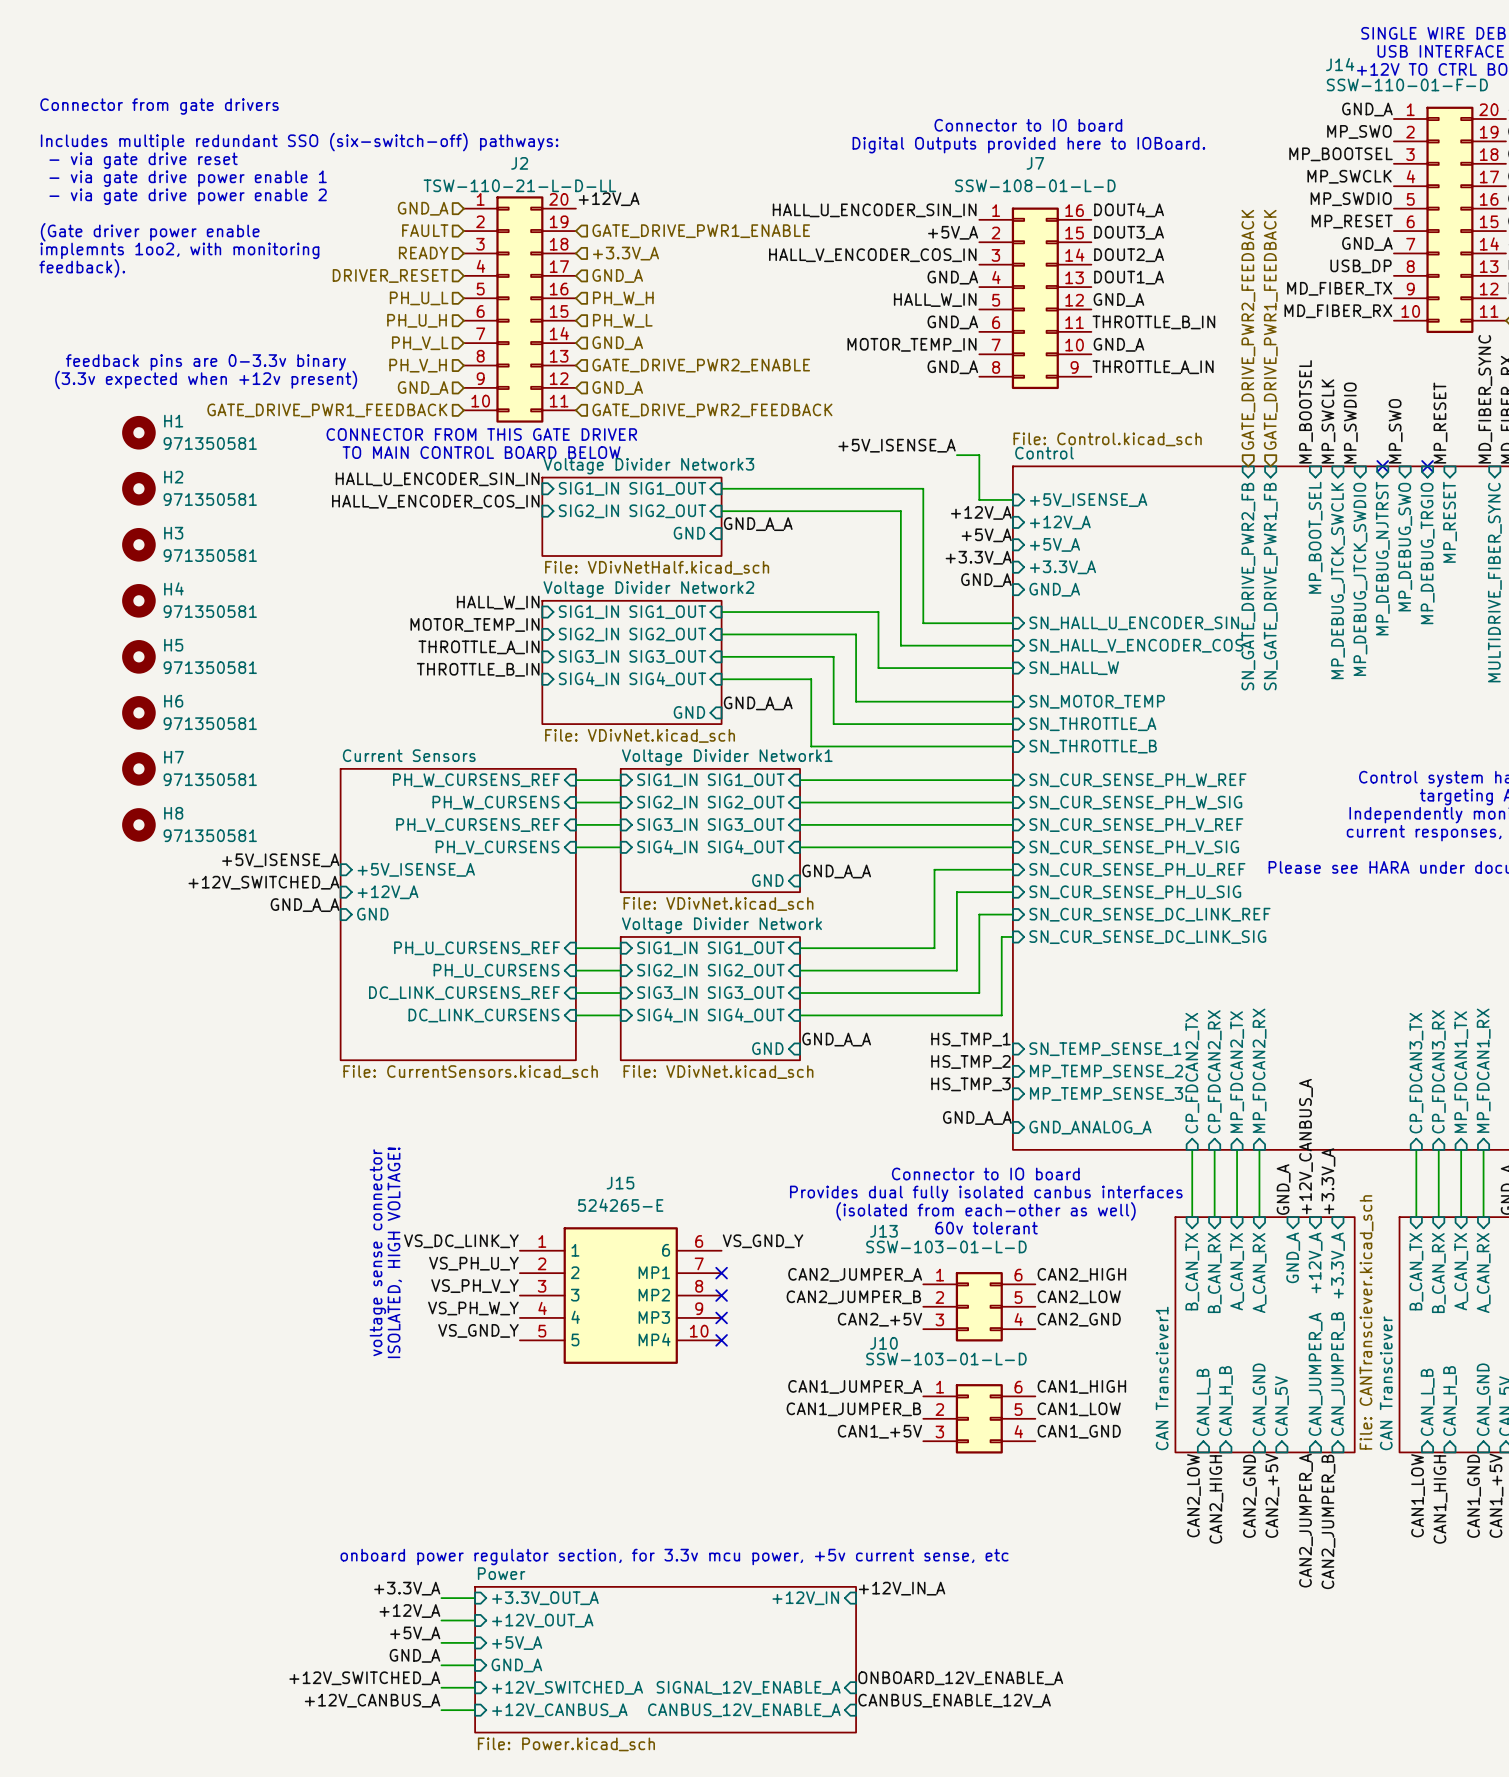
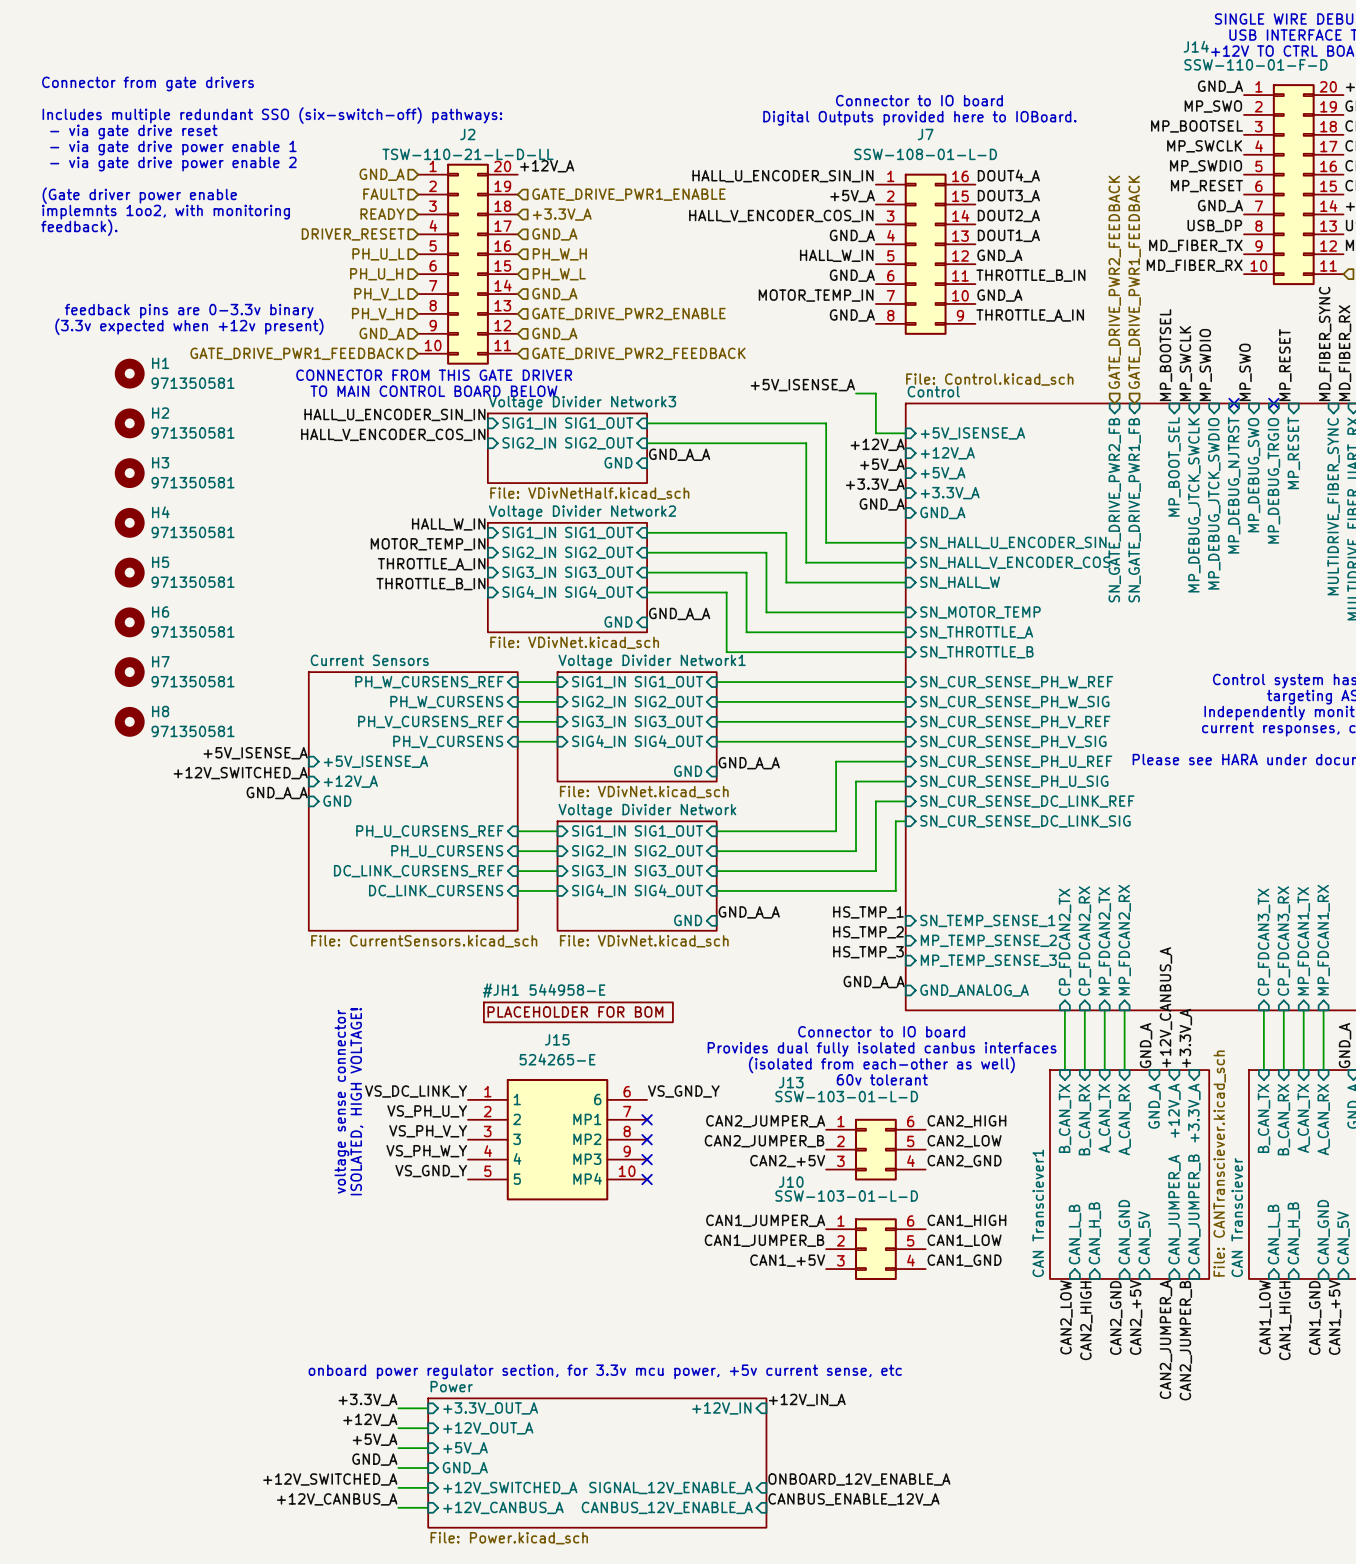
drawing: none -> [483, 1002, 673, 1023]

